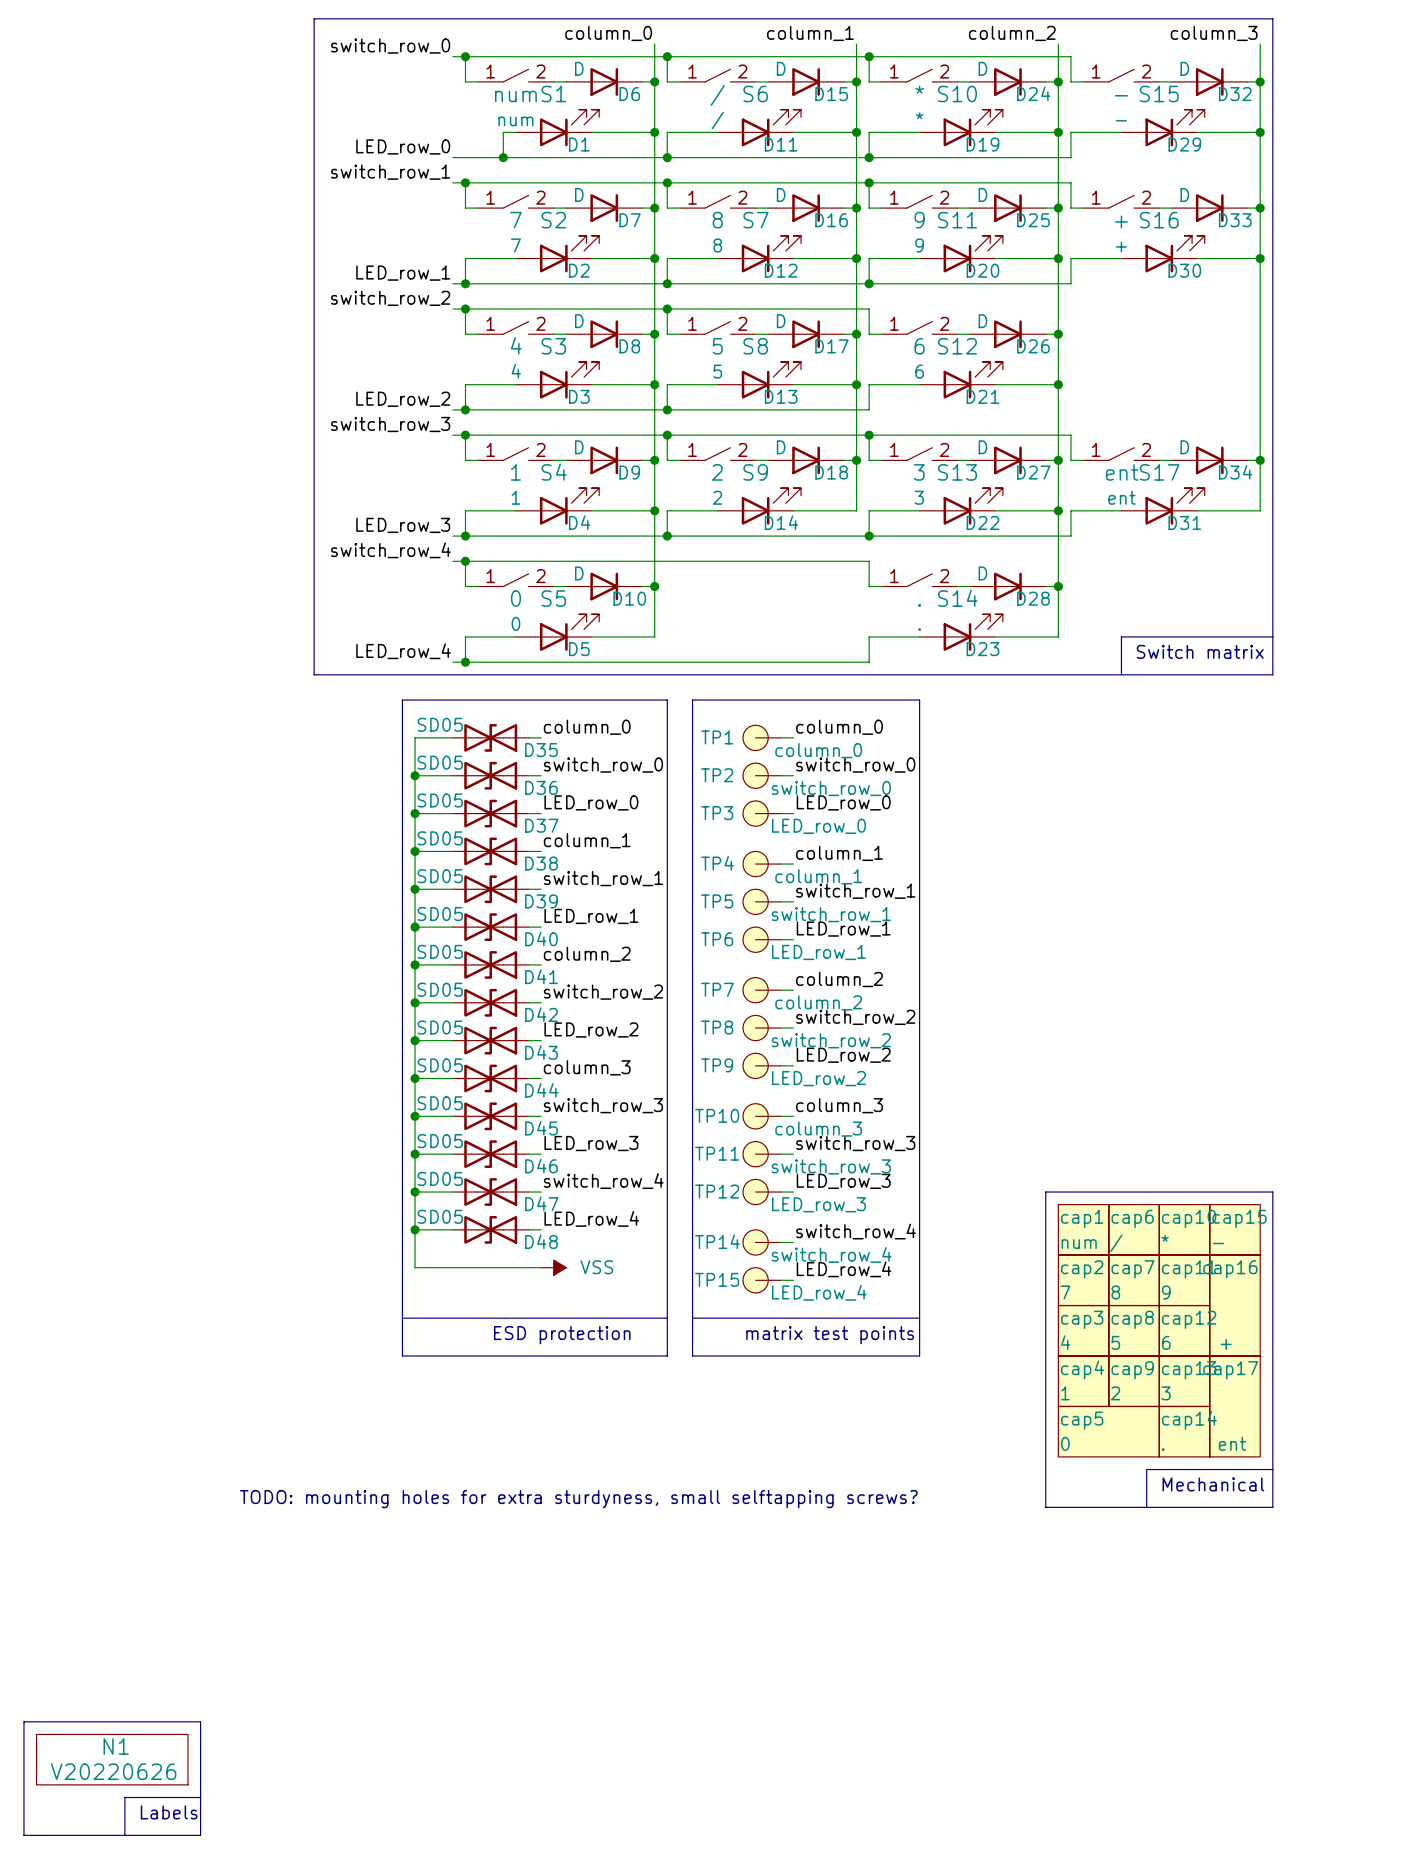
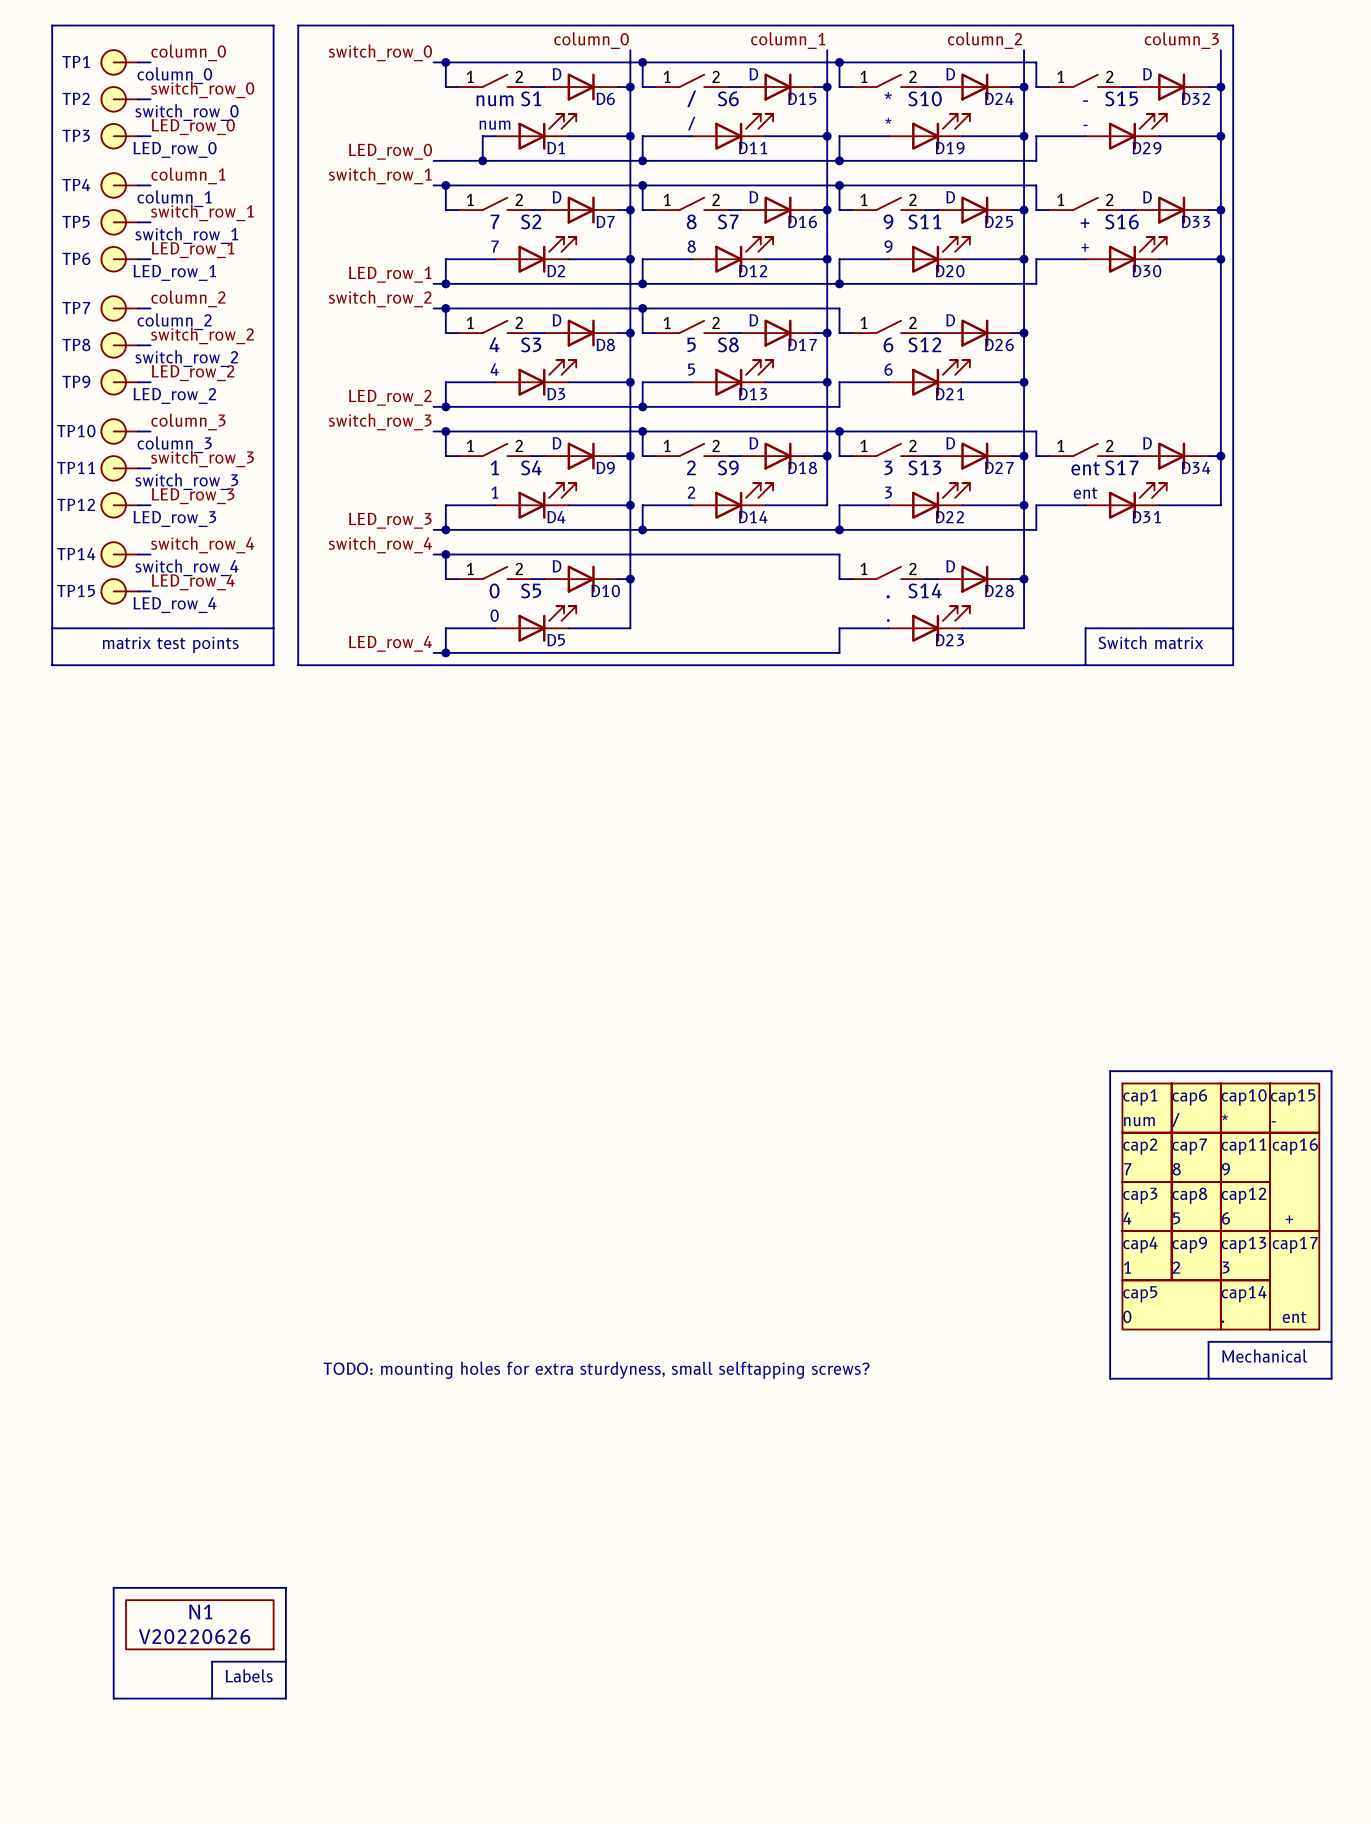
line: none -> (52, 25) (273, 25) (273, 665) (52, 665) (52, 25)
label: none -> column_0 (188, 52)
wire: none -> (138, 62) (150, 62)
label: none -> switch_row_0 (202, 89)
wire: none -> (138, 99) (150, 99)
label: none -> LED_row_0 (193, 127)
wire: none -> (138, 136) (150, 136)
label: none -> column_1 (188, 175)
wire: none -> (138, 185) (150, 185)
label: none -> switch_row_1 (202, 212)
wire: none -> (138, 222) (150, 222)
label: none -> LED_row_1 (193, 250)
wire: none -> (138, 259) (150, 259)
label: none -> column_2 (188, 298)
wire: none -> (138, 308) (150, 308)
label: none -> switch_row_2 (202, 335)
wire: none -> (138, 345) (150, 345)
label: none -> LED_row_2 (193, 373)
wire: none -> (138, 382) (150, 382)
label: none -> column_3 (188, 421)
wire: none -> (138, 431) (150, 431)
label: none -> switch_row_3 (202, 458)
wire: none -> (138, 468) (150, 468)
label: none -> LED_row_3 (193, 496)
wire: none -> (138, 505) (150, 505)
label: none -> switch_row_4 (202, 544)
wire: none -> (138, 554) (150, 554)
label: none -> LED_row_4 (193, 582)
wire: none -> (138, 591) (150, 591)
line: none -> (52, 628) (273, 628)
text: none -> matrix test points (170, 644)
line: (402, 700) (667, 700) (667, 1356) (402, 1356) (402, 700) -> none
line: (692, 700) (919, 700) (919, 1356) (692, 1356) (692, 700) -> none
label: column_0 (587, 727) -> none
label: column_0 (839, 727) -> none
wire: (452, 737) (415, 737) (415, 1267) (541, 1267) -> none
D35: SD05 (490, 737) -> none
wire: (528, 737) (541, 737) -> none
TP1 position: (761, 737) -> (119, 62)
wire: (780, 737) (793, 737) -> none
label: switch_row_0 (603, 765) -> none
label: switch_row_0 (855, 765) -> none
wire: (415, 775) (452, 775) -> none
junction: (415, 775) -> none
D36: SD05 (490, 775) -> none
wire: (528, 775) (541, 775) -> none
TP2 position: (761, 775) -> (119, 99)
wire: (780, 775) (793, 775) -> none
label: LED_row_0 (591, 802) -> none
label: LED_row_0 (843, 802) -> none
wire: (415, 813) (452, 813) -> none
junction: (415, 813) -> none
D37: SD05 (490, 813) -> none
wire: (528, 813) (541, 813) -> none
TP3 position: (761, 813) -> (119, 136)
wire: (780, 813) (793, 813) -> none
label: column_1 (587, 840) -> none
wire: (415, 851) (452, 851) -> none
junction: (415, 851) -> none
D38: SD05 (490, 851) -> none
wire: (528, 851) (541, 851) -> none
label: column_1 (839, 853) -> none
TP4 position: (761, 864) -> (119, 185)
wire: (780, 864) (793, 864) -> none
label: switch_row_1 (603, 878) -> none
wire: (415, 889) (452, 889) -> none
junction: (415, 889) -> none
D39: SD05 (490, 889) -> none
wire: (528, 889) (541, 889) -> none
label: switch_row_1 (855, 891) -> none
TP5 position: (761, 901) -> (119, 222)
wire: (780, 901) (793, 901) -> none
label: LED_row_1 (591, 916) -> none
wire: (415, 927) (452, 927) -> none
junction: (415, 927) -> none
D40: SD05 (490, 927) -> none
wire: (528, 927) (541, 927) -> none
label: LED_row_1 (843, 929) -> none
TP6 position: (761, 939) -> (119, 259)
wire: (780, 939) (793, 939) -> none
label: column_2 (587, 954) -> none
wire: (415, 964) (452, 964) -> none
junction: (415, 964) -> none
D41: SD05 (490, 964) -> none
wire: (528, 964) (541, 964) -> none
label: column_2 (839, 979) -> none
TP7 position: (761, 990) -> (119, 308)
wire: (780, 990) (793, 990) -> none
label: switch_row_2 (603, 992) -> none
wire: (415, 1002) (452, 1002) -> none
junction: (415, 1002) -> none
D42: SD05 (490, 1002) -> none
wire: (528, 1002) (541, 1002) -> none
label: switch_row_2 (855, 1017) -> none
TP8 position: (761, 1028) -> (119, 345)
wire: (780, 1028) (793, 1028) -> none
label: LED_row_2 (591, 1029) -> none
wire: (415, 1040) (452, 1040) -> none
junction: (415, 1040) -> none
D43: SD05 (490, 1040) -> none
wire: (528, 1040) (541, 1040) -> none
label: LED_row_2 (843, 1055) -> none
TP9 position: (761, 1065) -> (119, 382)
wire: (780, 1065) (793, 1065) -> none
label: column_3 (587, 1067) -> none
wire: (415, 1078) (452, 1078) -> none
junction: (415, 1078) -> none
D44: SD05 (490, 1078) -> none
wire: (528, 1078) (541, 1078) -> none
label: switch_row_3 (603, 1105) -> none
label: column_3 (839, 1105) -> none
wire: (415, 1116) (452, 1116) -> none
junction: (415, 1116) -> none
D45: SD05 (490, 1116) -> none
wire: (528, 1116) (541, 1116) -> none
TP10 position: (761, 1116) -> (119, 431)
wire: (780, 1116) (793, 1116) -> none
cap10: none -> * (1245, 1108)
cap15: none -> - (1294, 1108)
label: LED_row_3 (591, 1143) -> none
label: switch_row_3 (855, 1143) -> none
wire: (415, 1154) (452, 1154) -> none
junction: (415, 1154) -> none
D46: SD05 (490, 1154) -> none
wire: (528, 1154) (541, 1154) -> none
TP11 position: (761, 1154) -> (119, 468)
wire: (780, 1154) (793, 1154) -> none
cap11: none -> 9 (1245, 1157)
label: switch_row_4 (603, 1181) -> none
label: LED_row_3 (843, 1181) -> none
wire: (415, 1192) (452, 1192) -> none
junction: (415, 1192) -> none
D47: SD05 (490, 1192) -> none
wire: (528, 1192) (541, 1192) -> none
TP12 position: (761, 1192) -> (119, 505)
wire: (780, 1192) (793, 1192) -> none
line: (1045, 1192) (1045, 1507) (1272, 1507) (1272, 1192) (1045, 1192) -> (1110, 1071) (1110, 1378) (1331, 1378) (1331, 1071) (1110, 1071)
label: LED_row_4 (591, 1218) -> none
cap10 name: cap10 (1189, 1218) -> cap3 (1140, 1195)
cap15 name: cap15 (1239, 1218) -> cap8 (1189, 1195)
wire: (415, 1229) (452, 1229) -> none
junction: (415, 1229) -> none
D48: SD05 (490, 1229) -> none
wire: (528, 1229) (541, 1229) -> none
cap1 position: (1083, 1229) -> (1147, 1108)
cap6 position: (1134, 1229) -> (1196, 1108)
label: switch_row_4 (856, 1231) -> none
cap10 value: * (1165, 1238) -> 4 (1127, 1218)
TP14 position: (761, 1242) -> (119, 554)
wire: (780, 1242) (793, 1242) -> none
cap15 value: - (1218, 1243) -> 5 (1176, 1218)
power symbol: VSS (553, 1267) -> none
label: LED_row_4 (844, 1269) -> none
cap11 name: cap11 (1189, 1269) -> cap4 (1140, 1244)
TP15 position: (761, 1280) -> (119, 591)
wire: (780, 1280) (793, 1280) -> none
cap2 position: (1083, 1280) -> (1147, 1157)
cap7 position: (1134, 1280) -> (1196, 1157)
cap11 value: 9 (1166, 1292) -> 1 (1127, 1267)
cap16 position: (1234, 1305) -> (1294, 1181)
line: (402, 1318) (667, 1318) -> none
line: (692, 1318) (919, 1318) -> none
cap3: 4 (1083, 1330) -> none
cap8: 5 (1134, 1330) -> none
cap12 position: (1184, 1330) -> (1245, 1206)
text: ESD protection (562, 1335) -> none
text: matrix test points (830, 1335) -> none
cap4: 1 (1083, 1381) -> none
cap9 position: (1134, 1381) -> (1196, 1255)
cap13 position: (1184, 1381) -> (1245, 1255)
cap17 position: (1234, 1406) -> (1294, 1280)
cap5 position: (1108, 1431) -> (1171, 1304)
cap14 position: (1184, 1431) -> (1245, 1304)
line: (1272, 1469) (1146, 1469) (1146, 1507) -> (1331, 1341) (1208, 1341) (1208, 1378)
text position: Mechanical (1213, 1484) -> Mechanical (1264, 1356)
text position: TODO: mounting holes for extra sturdyness, small selftapping screws? (578, 1499) -> TODO: mounting holes for extra sturdyness, small selftapping screws? (596, 1370)
line: (23, 1721) (200, 1721) (200, 1835) (23, 1835) (23, 1721) -> (113, 1587) (285, 1587) (285, 1698) (113, 1698) (113, 1587)
N1 position: (112, 1759) -> (199, 1624)
line: (200, 1797) (124, 1797) (124, 1835) -> (285, 1661) (212, 1661) (212, 1698)
text position: Labels (169, 1812) -> Labels (249, 1675)

